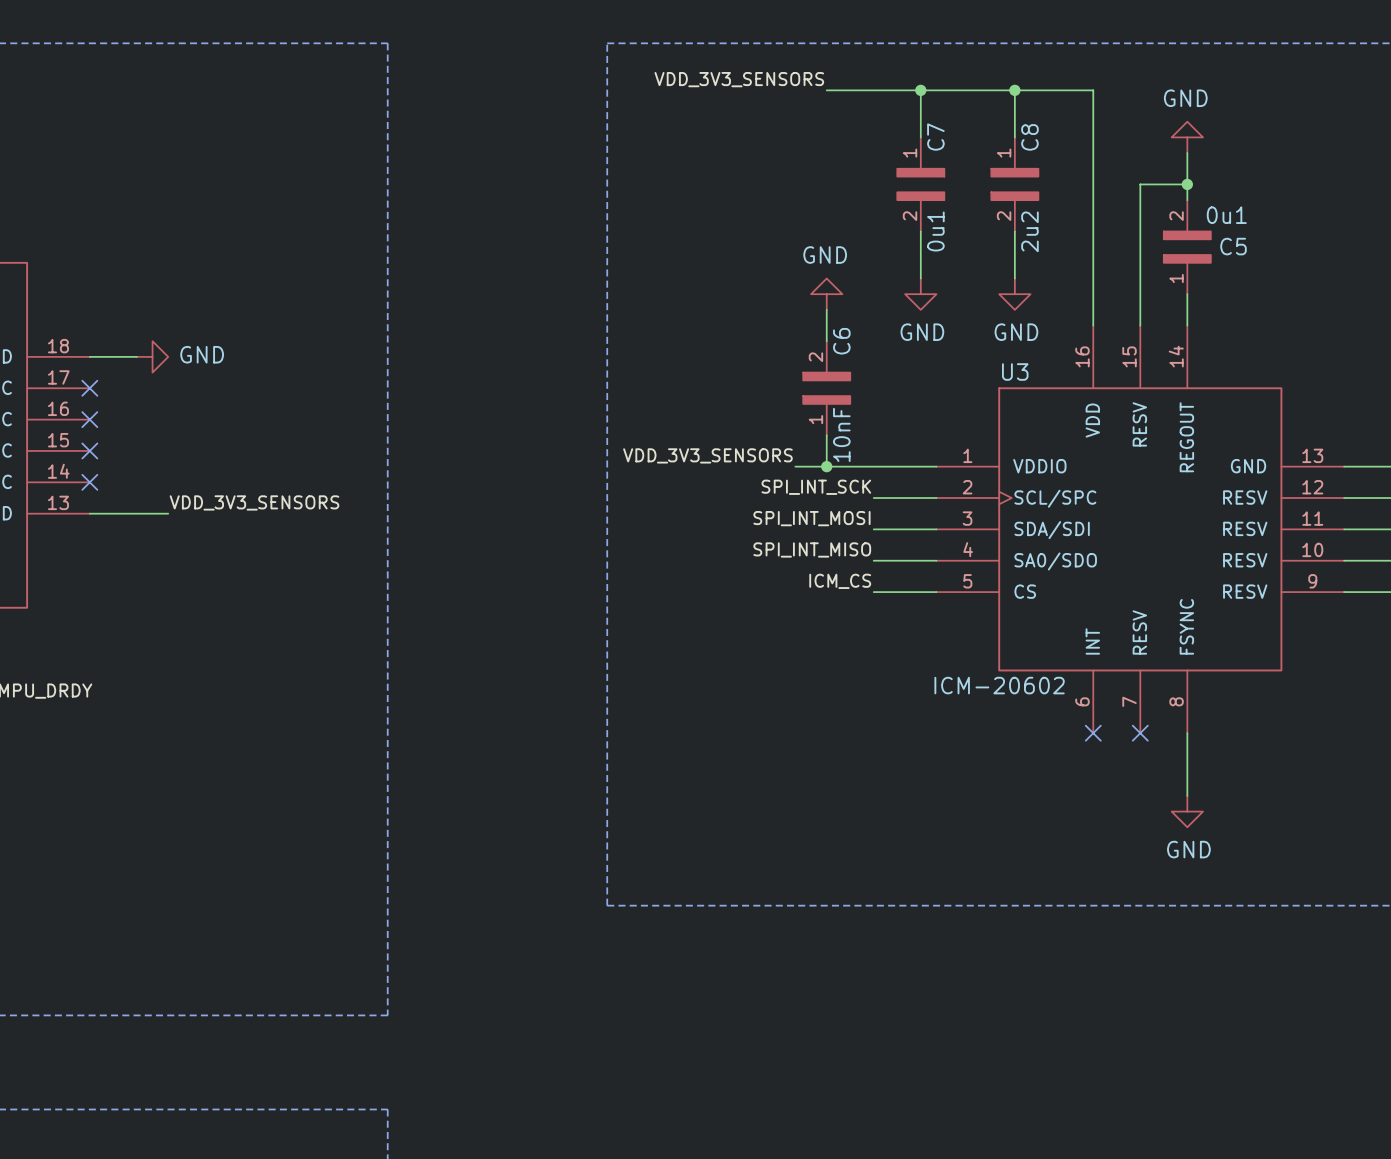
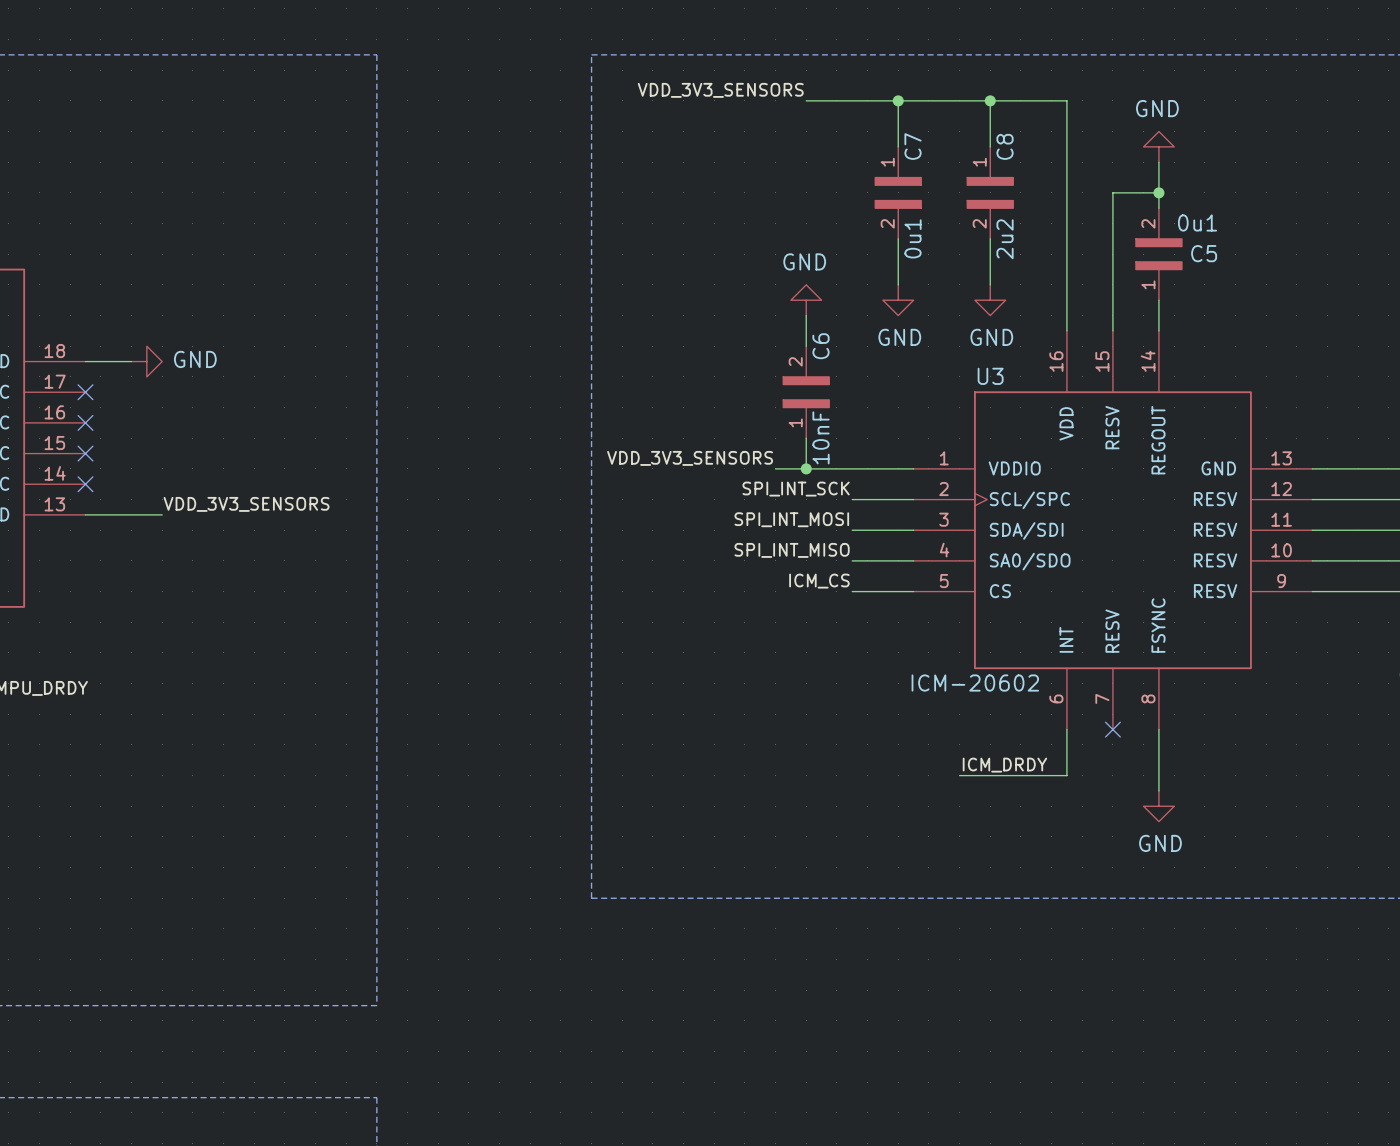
wire: none -> (1066, 729) (1066, 775) (959, 775)
no-connect mark: (1093, 733) -> none
label: none -> ICM_DRDY (1004, 765)

